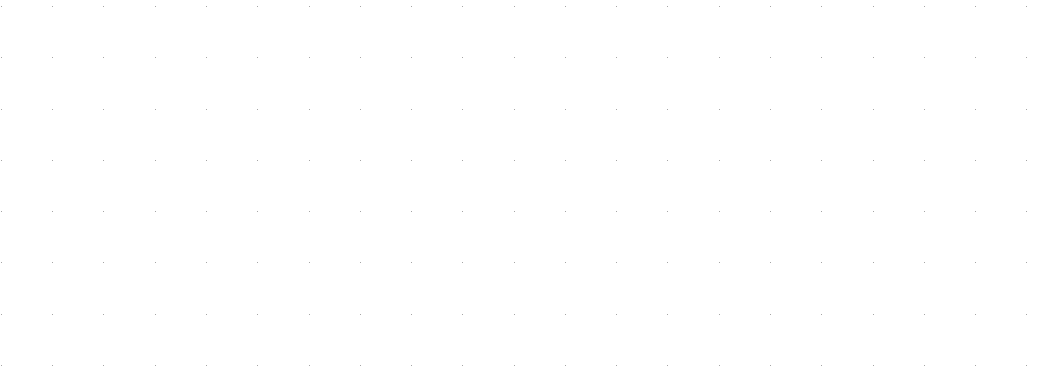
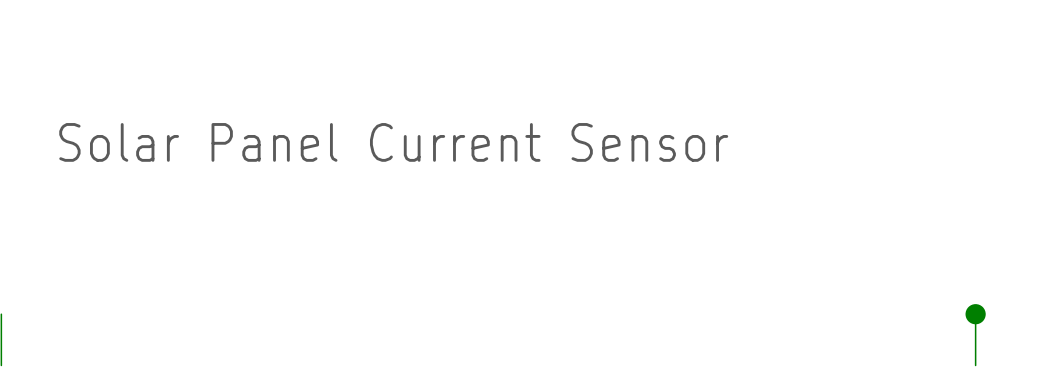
text: none -> Solar Panel Current Sensor (393, 142)
wire: none -> (1, 314) (1, 365)
wire: none -> (975, 314) (975, 365)
junction: none -> (975, 314)

